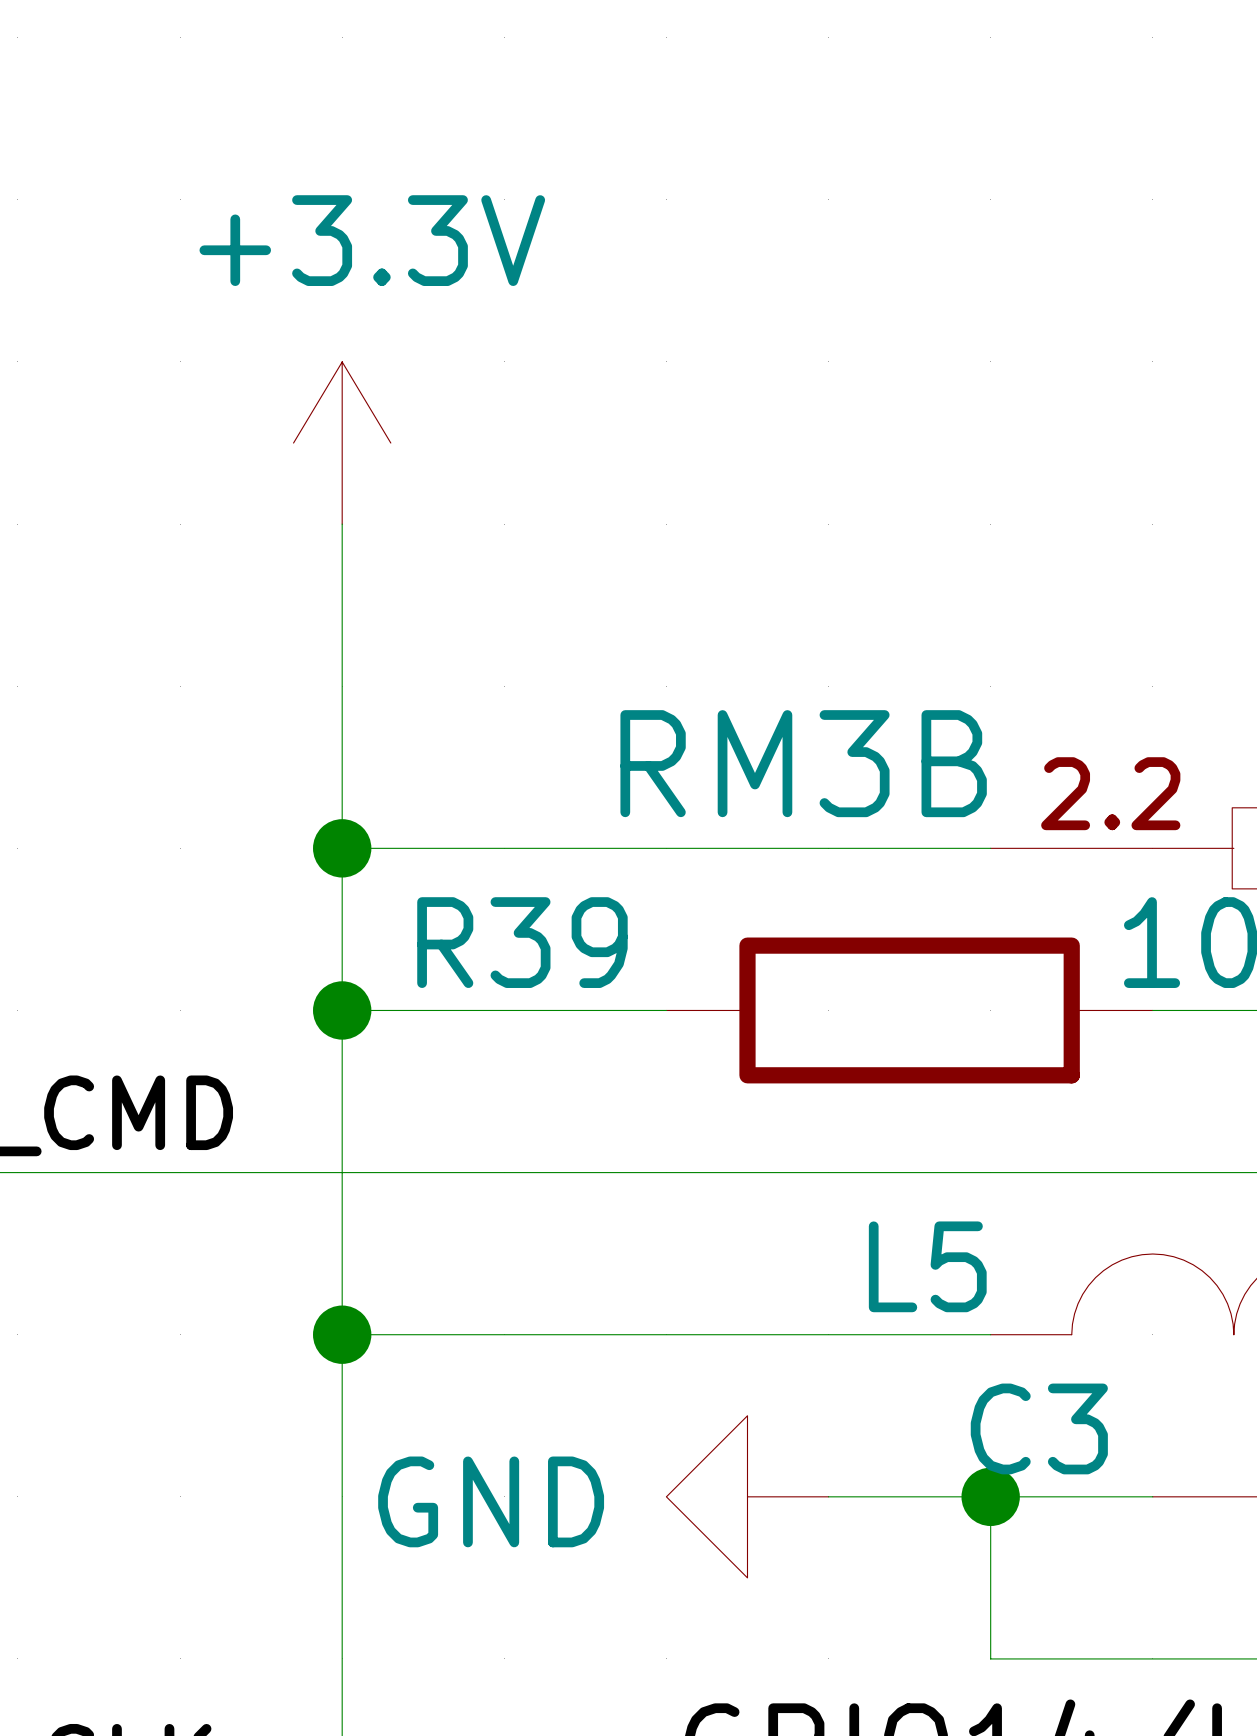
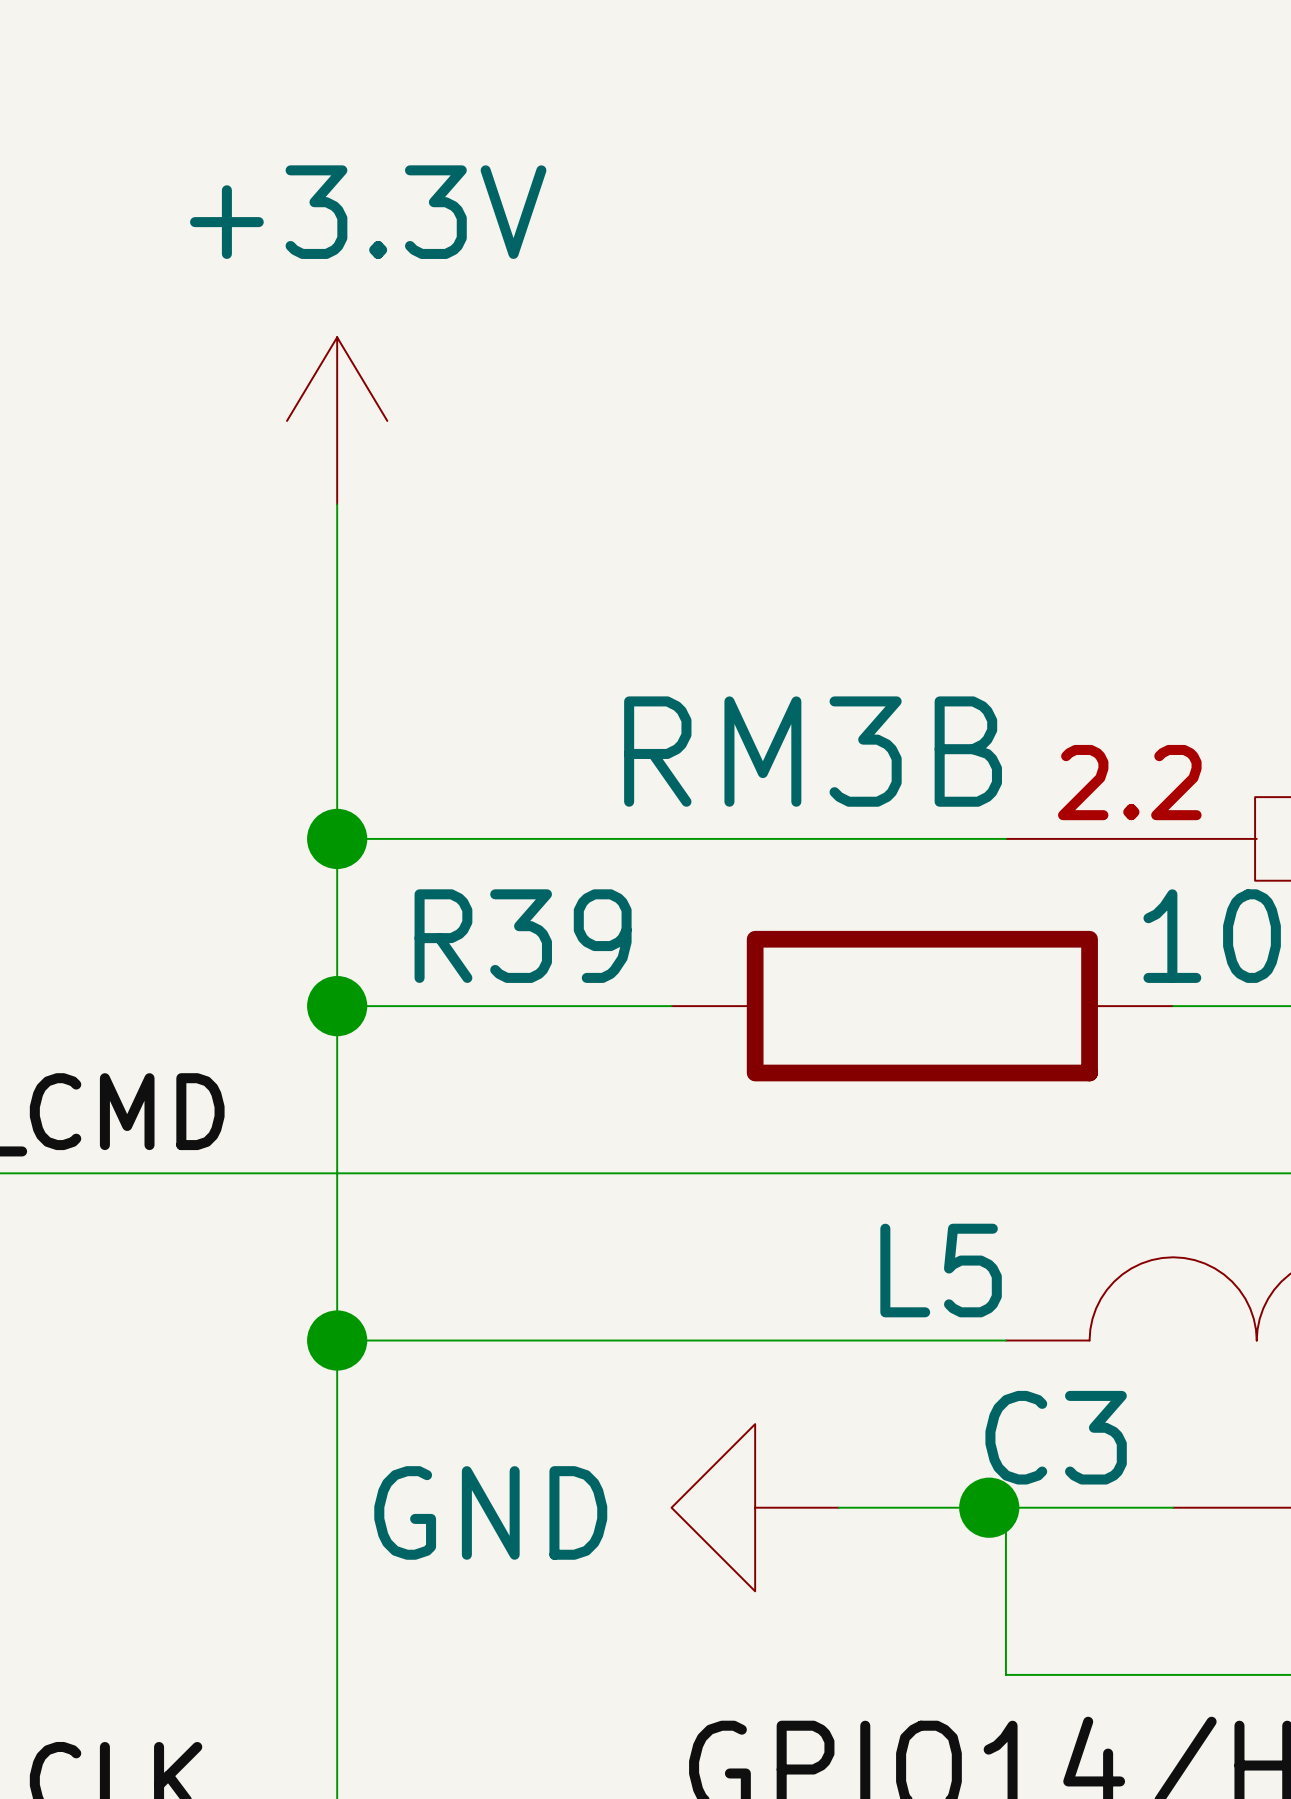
junction position: (990, 1496) -> (989, 1507)

